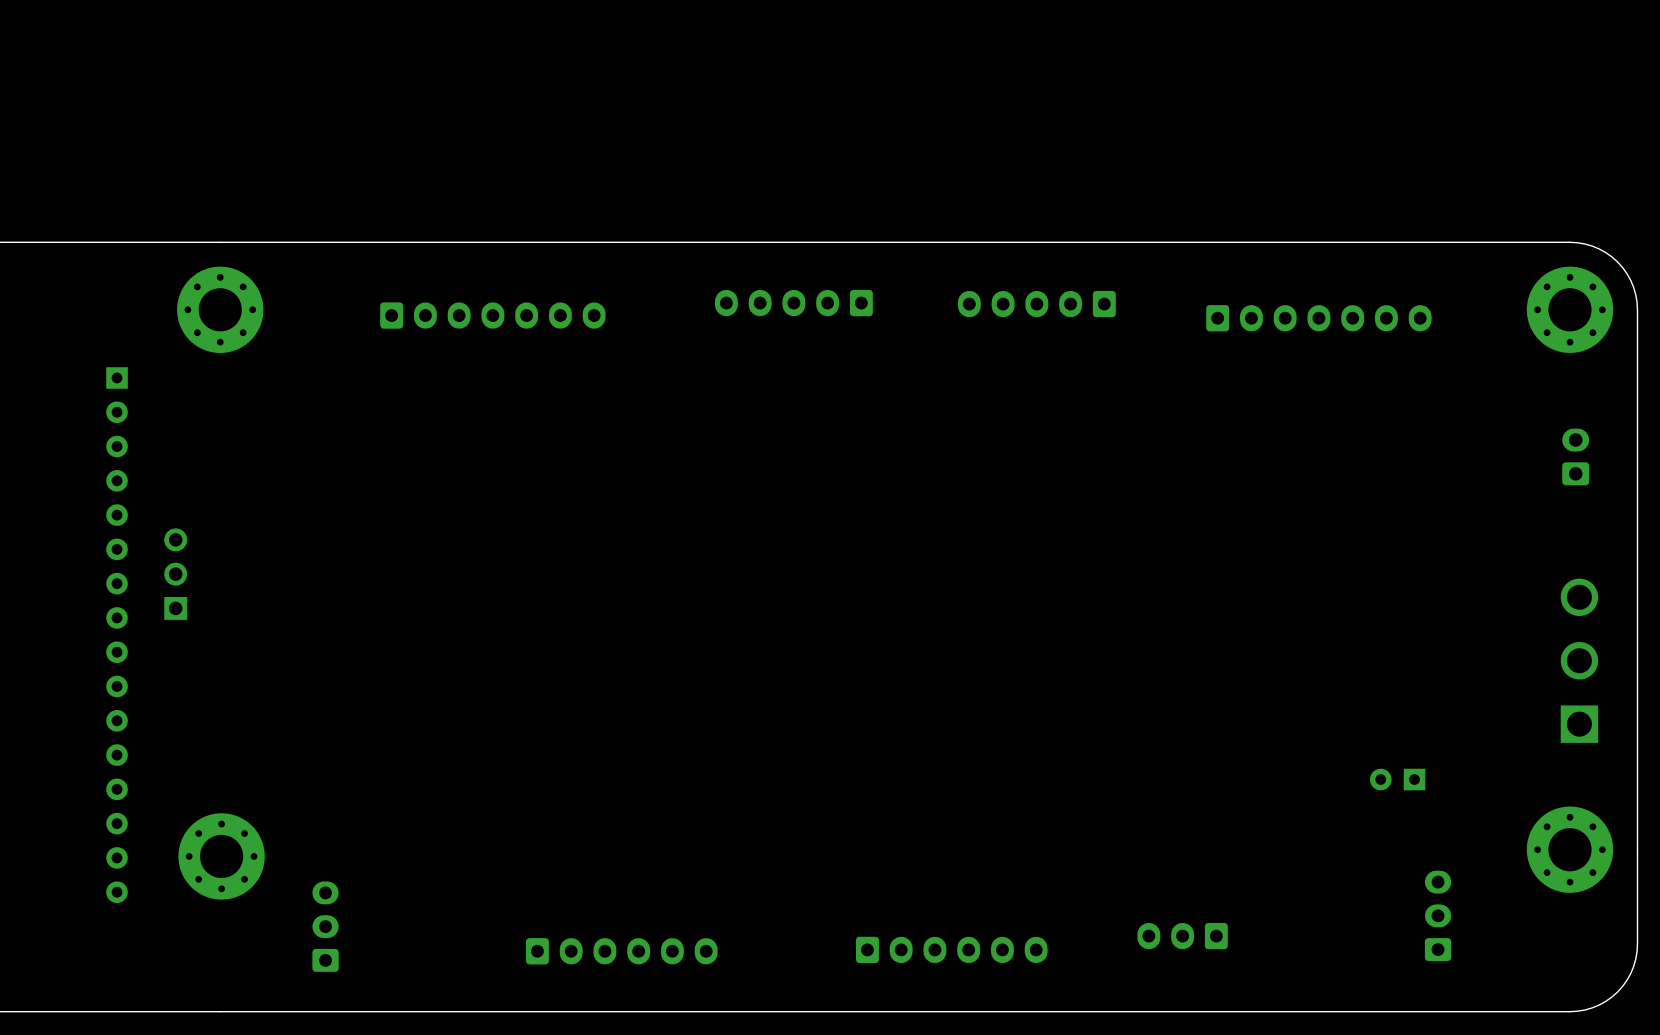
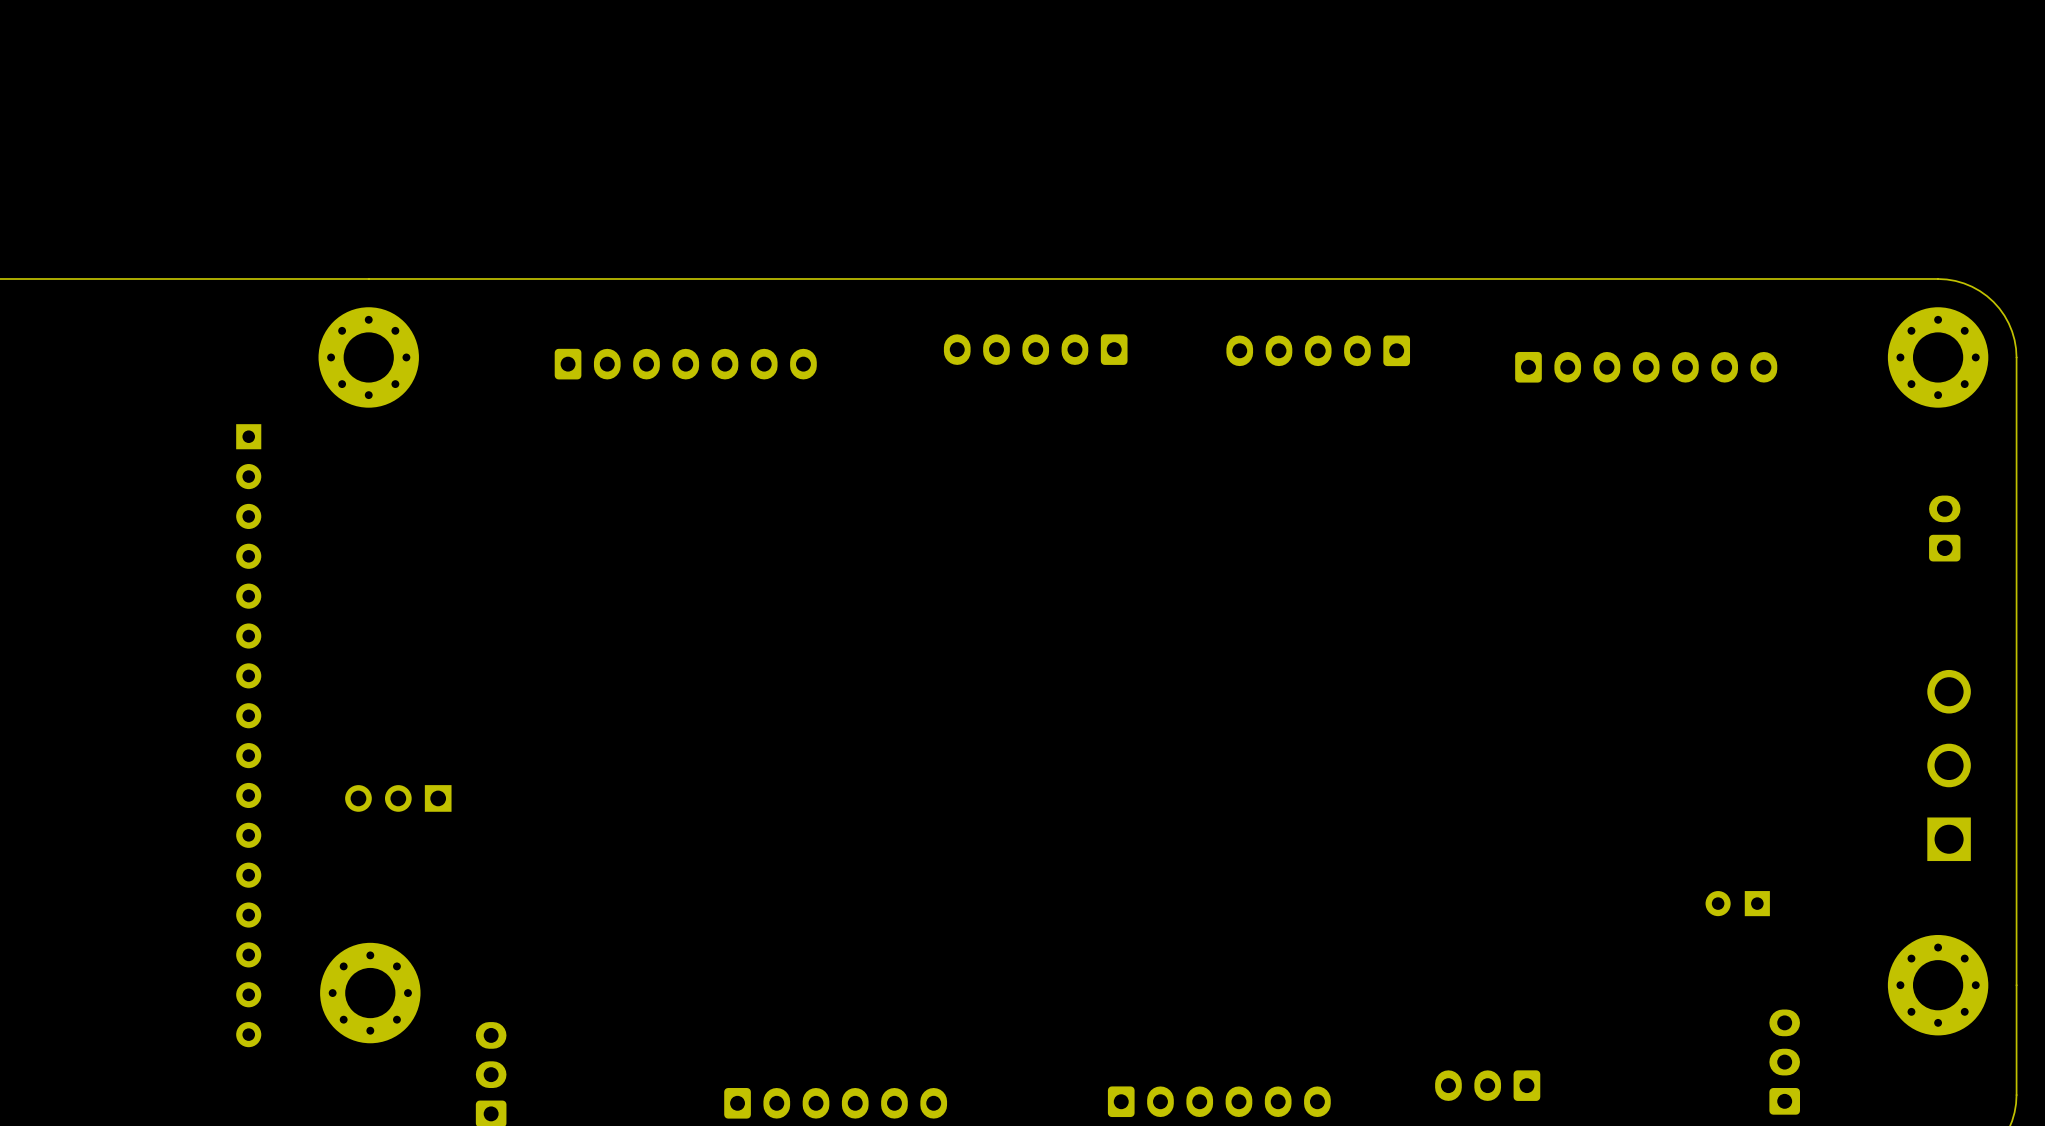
part rotation: 0° (175, 574) -> 90° counterclockwise (398, 798)
part position: (175, 574) -> (398, 798)

